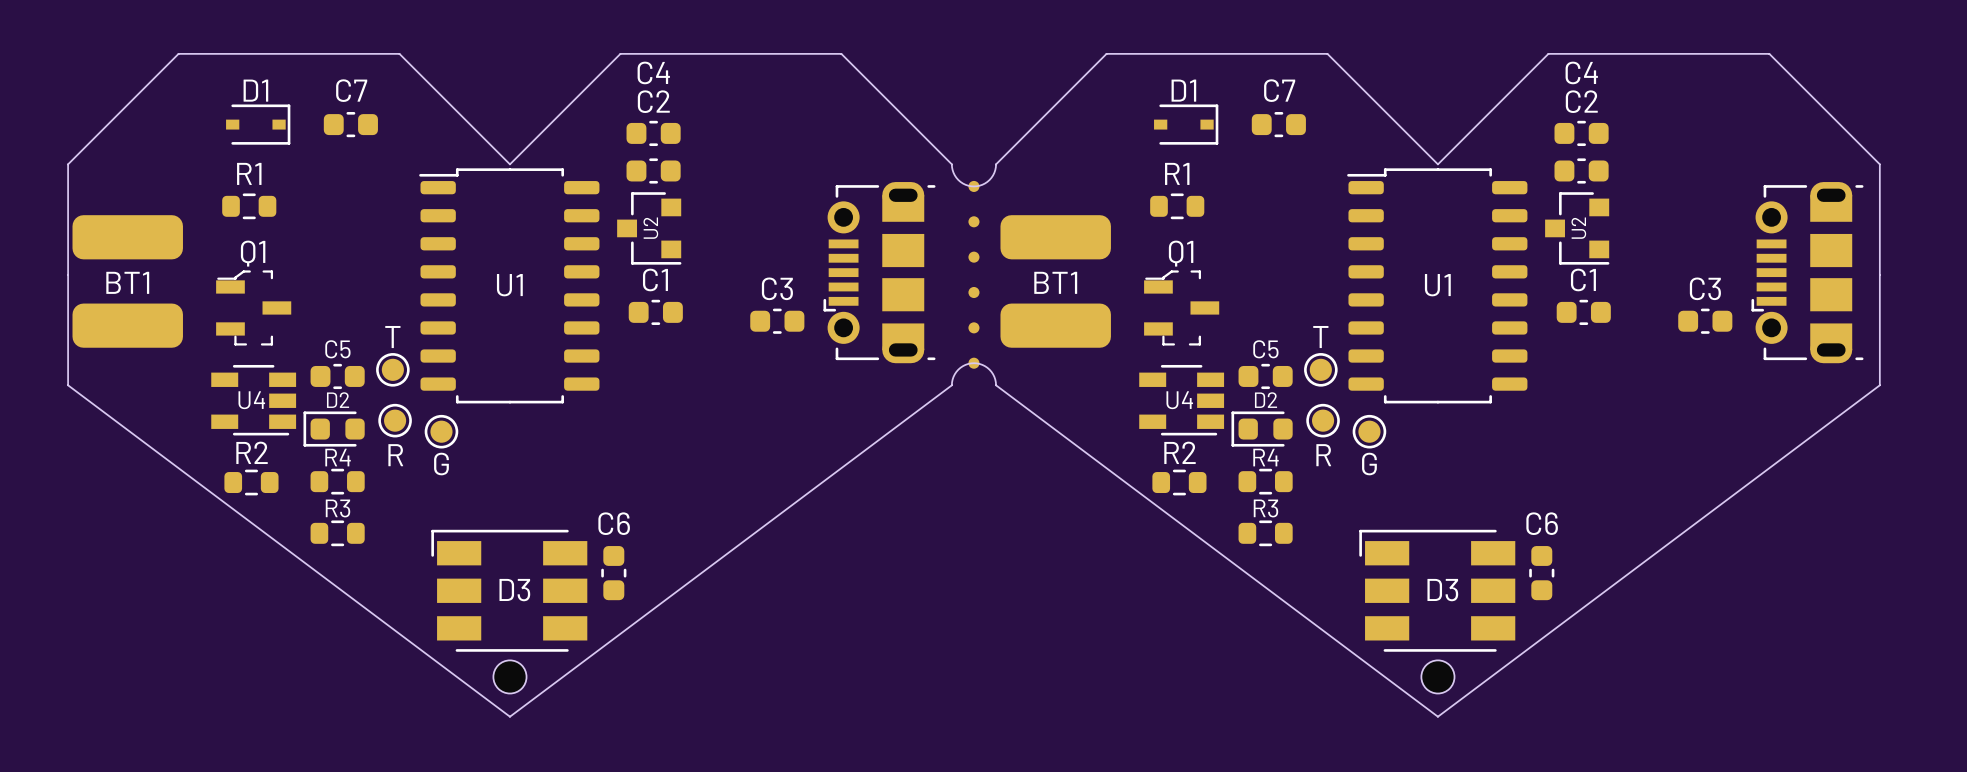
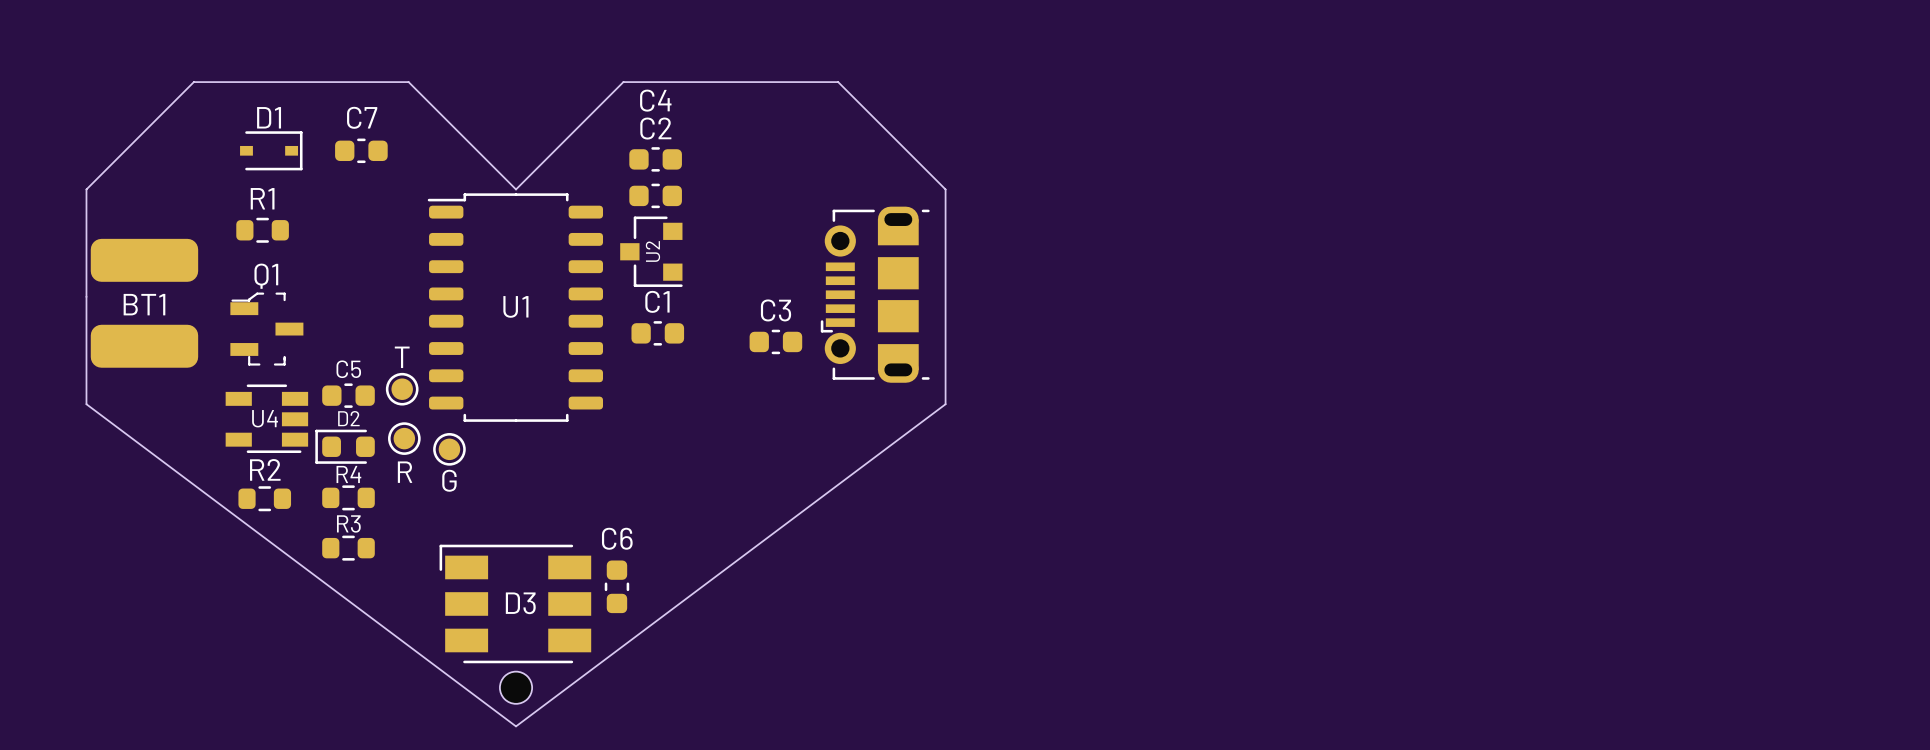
D1: (1186, 124) -> none
C7: (1278, 124) -> none
C4: (1581, 133) -> none
board edge: (951, 164) (956, 177) (965, 184) (976, 186) (987, 181) (993, 175) (996, 164) (1106, 53) (1327, 53) (1437, 164) (1548, 53) (1769, 53) (1879, 164) (1879, 385) (1437, 716) (996, 385) (993, 374) (987, 367) (976, 363) (965, 364) (956, 371) (951, 385) -> (945, 189) (945, 404)
C2: (1581, 170) -> none
part: (973, 186) -> none
R1: (1177, 206) -> none
part: (973, 221) -> none
U2: (1577, 228) -> none
part: (973, 257) -> none
part: (1807, 272) -> none
BT1: (1055, 281) -> none
U1: (1437, 285) -> none
part: (973, 292) -> none
Q1: (1181, 307) -> none
C1: (1583, 312) -> none
C3: (1705, 321) -> none
part: (973, 327) -> none
part: (973, 363) -> none
T: (1320, 369) -> none
C5: (1265, 376) -> none
U4: (1181, 400) -> none
R: (1323, 420) -> none
D2: (1262, 429) -> none
G: (1369, 431) -> none
R3: (1265, 481) -> none
R2: (1179, 482) -> none
R4: (1265, 533) -> none
C6: (1541, 573) -> none
D3: (1437, 590) -> none
part: (1437, 676) -> none

